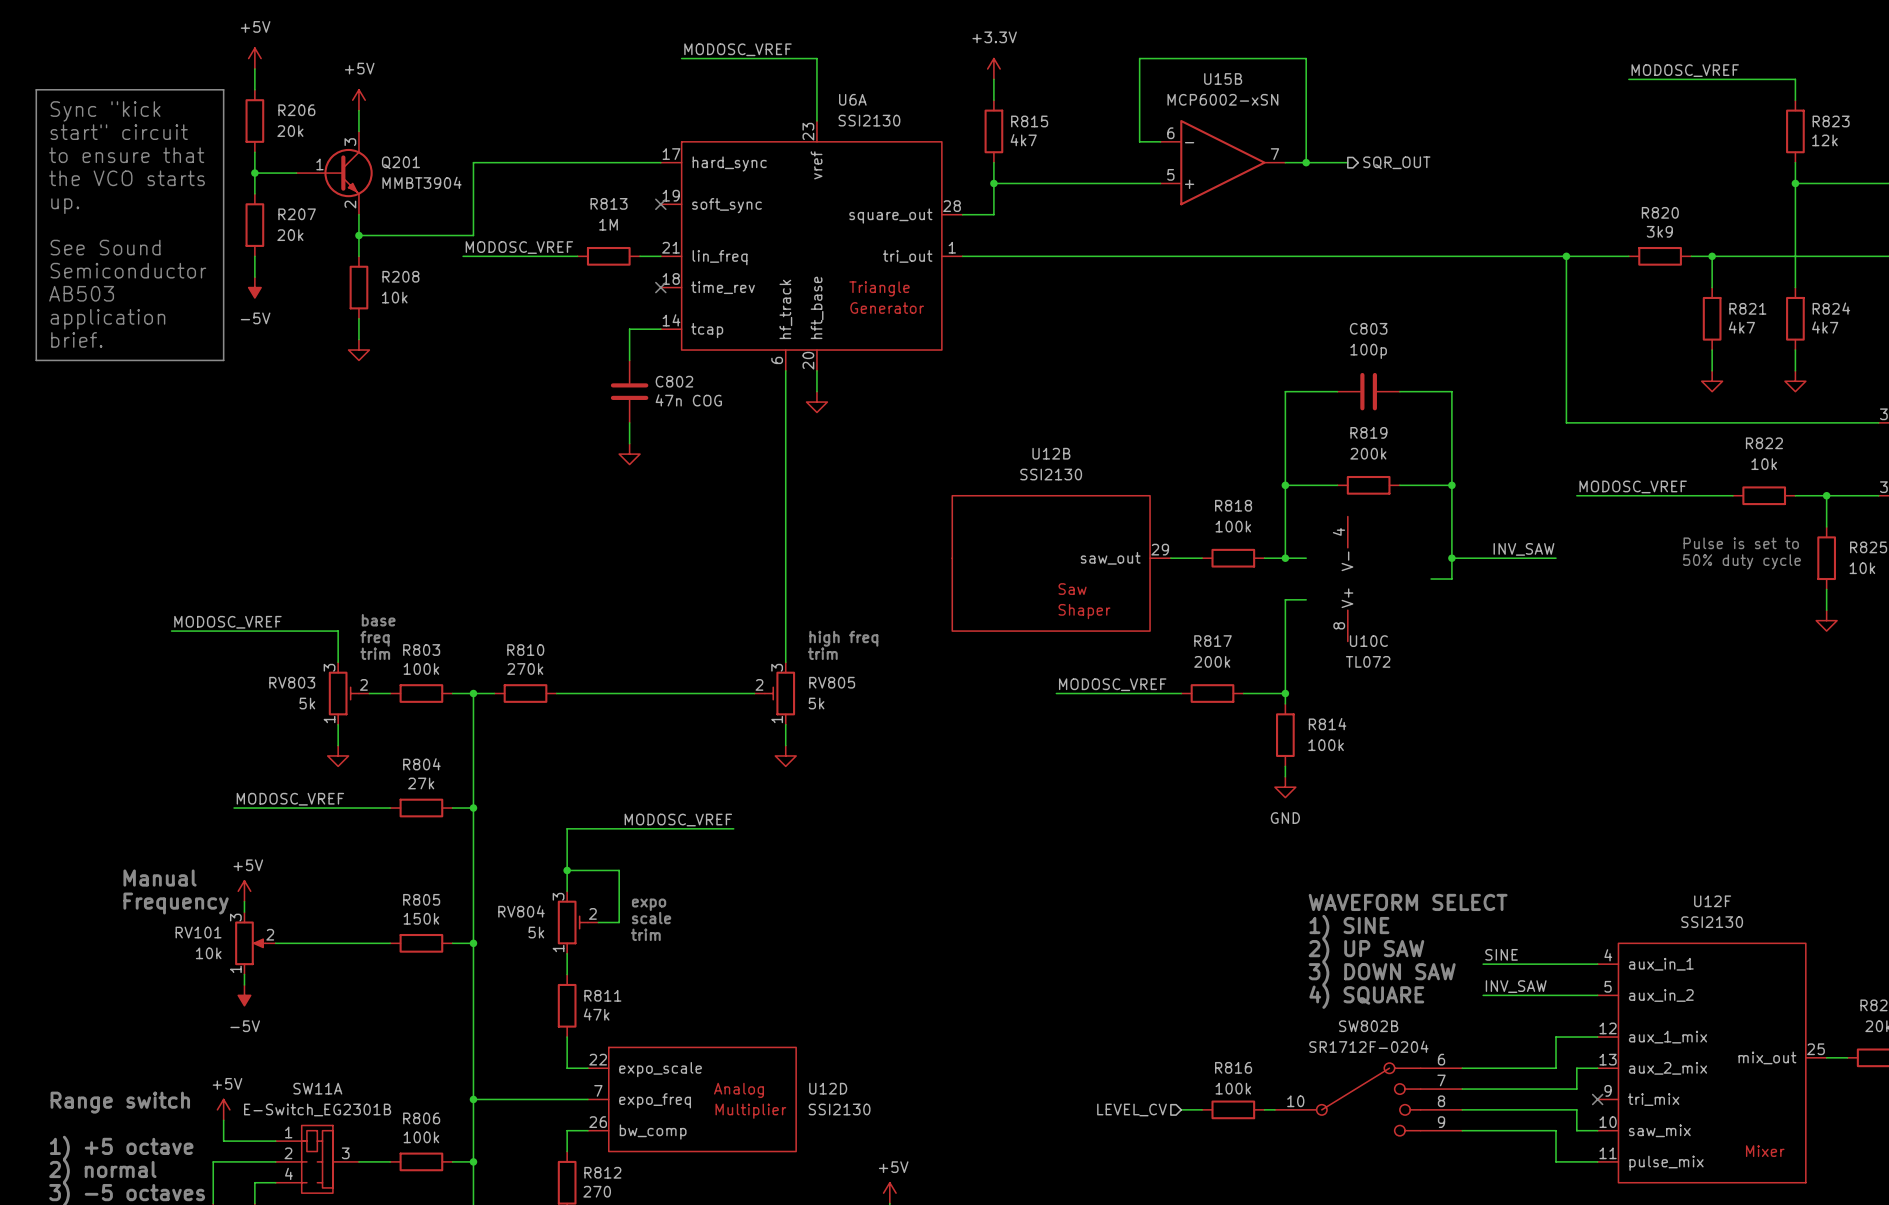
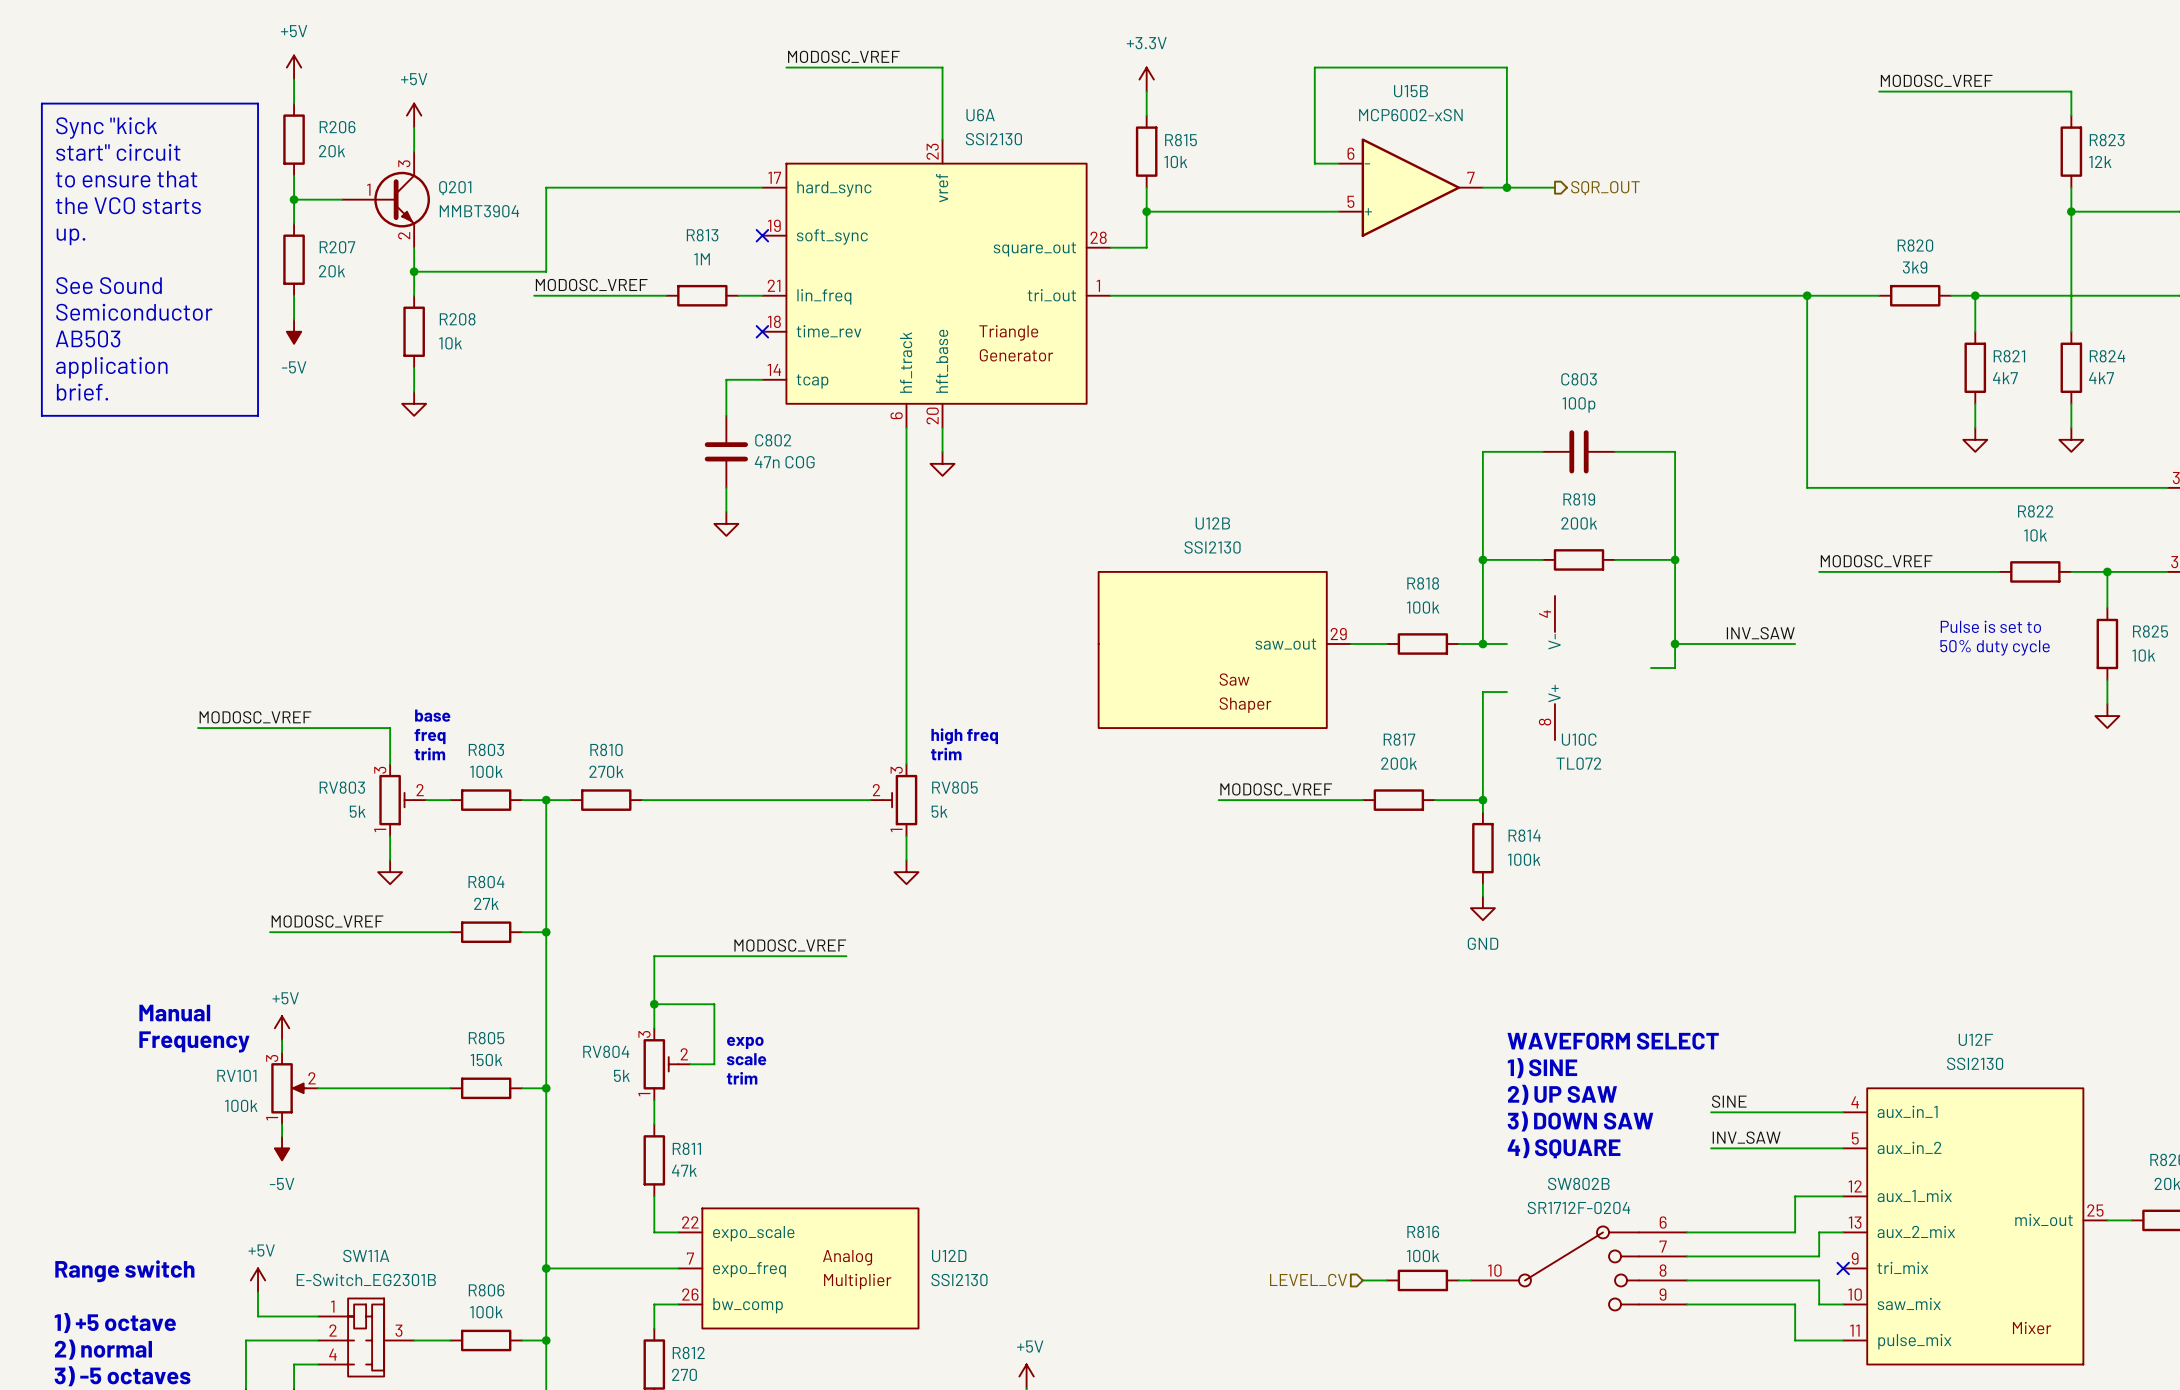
R815 value: 4k7 (1023, 140) -> 10k (1175, 161)
RV101 value: 10k (208, 953) -> 100k (241, 1105)

